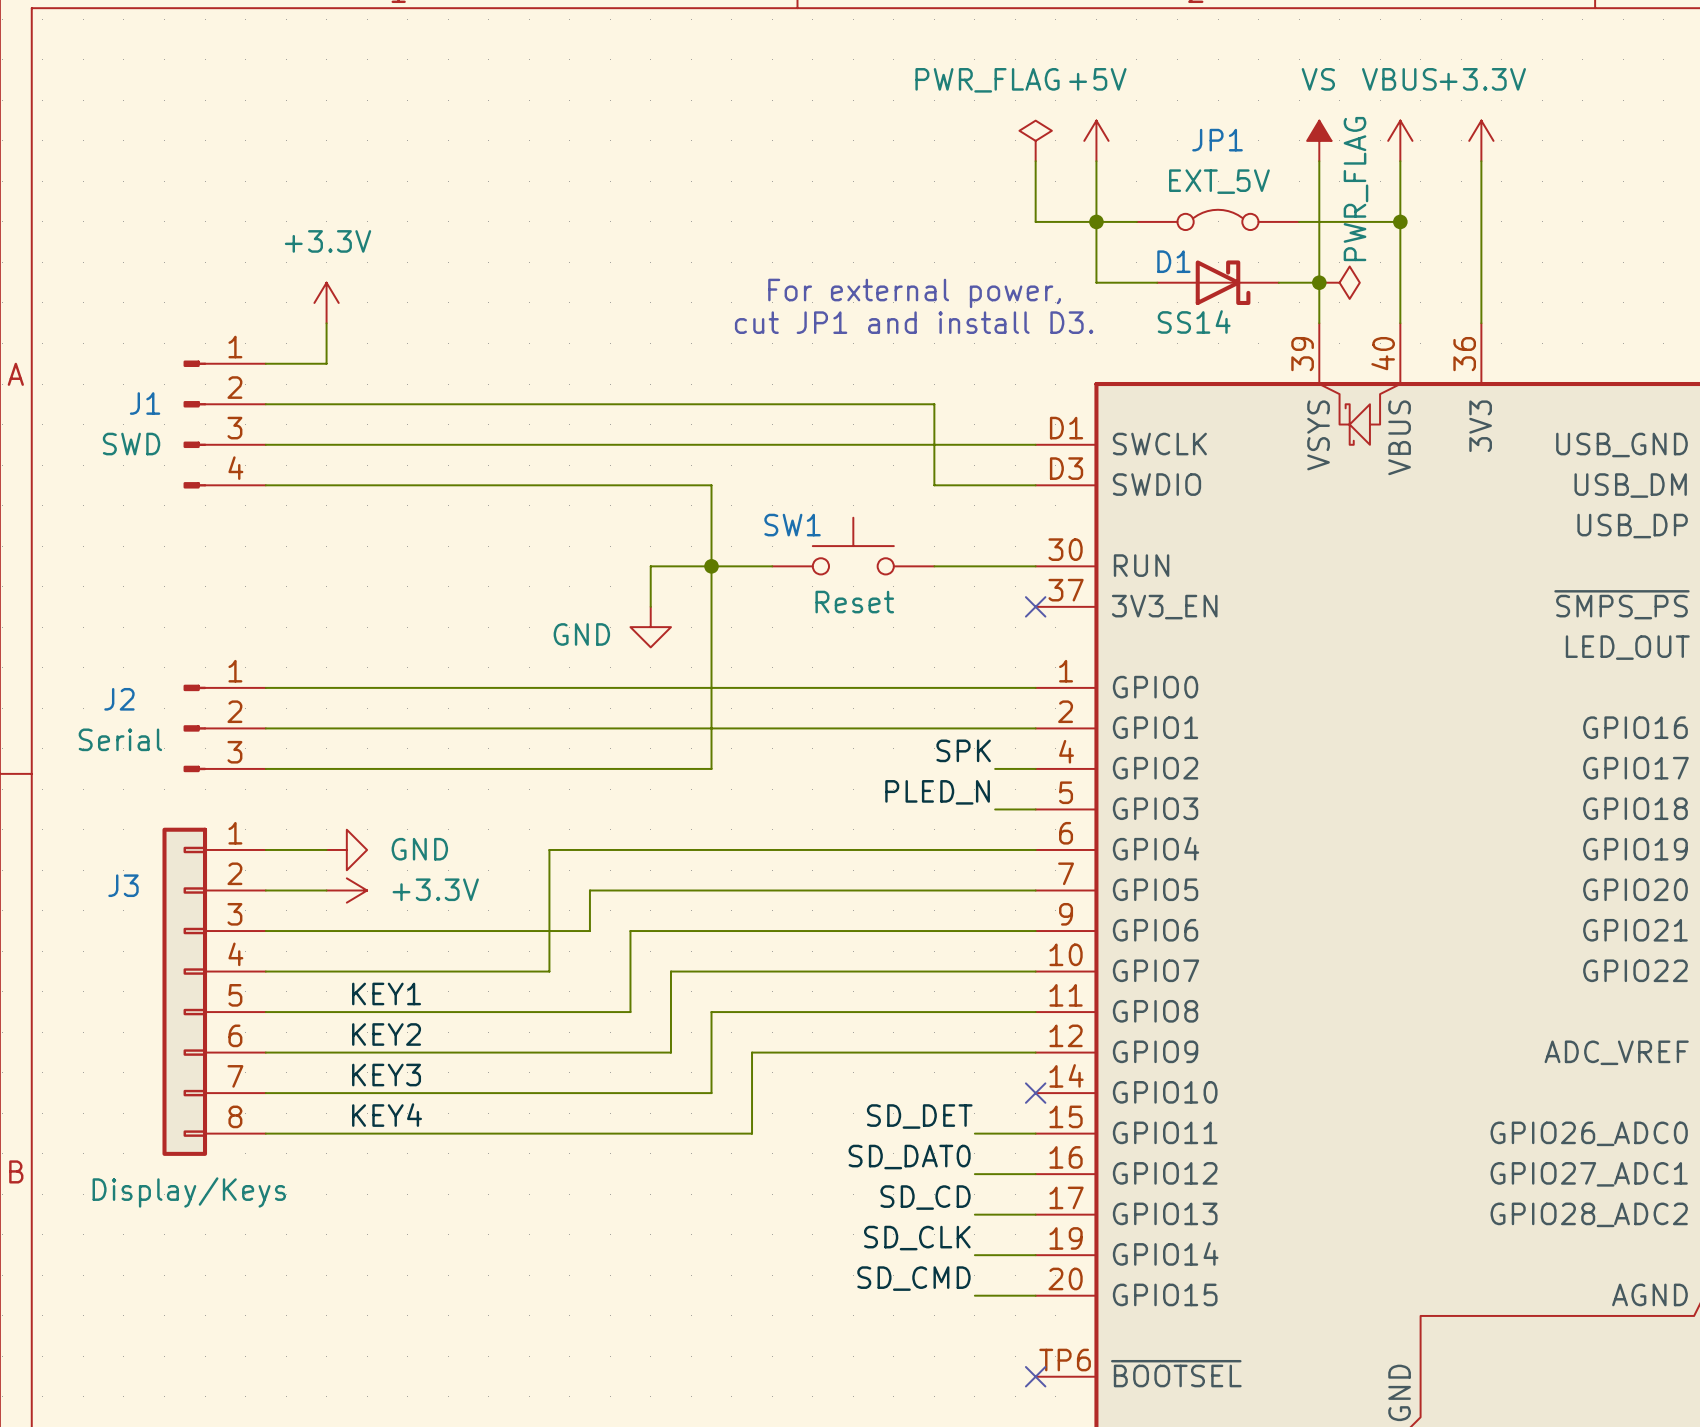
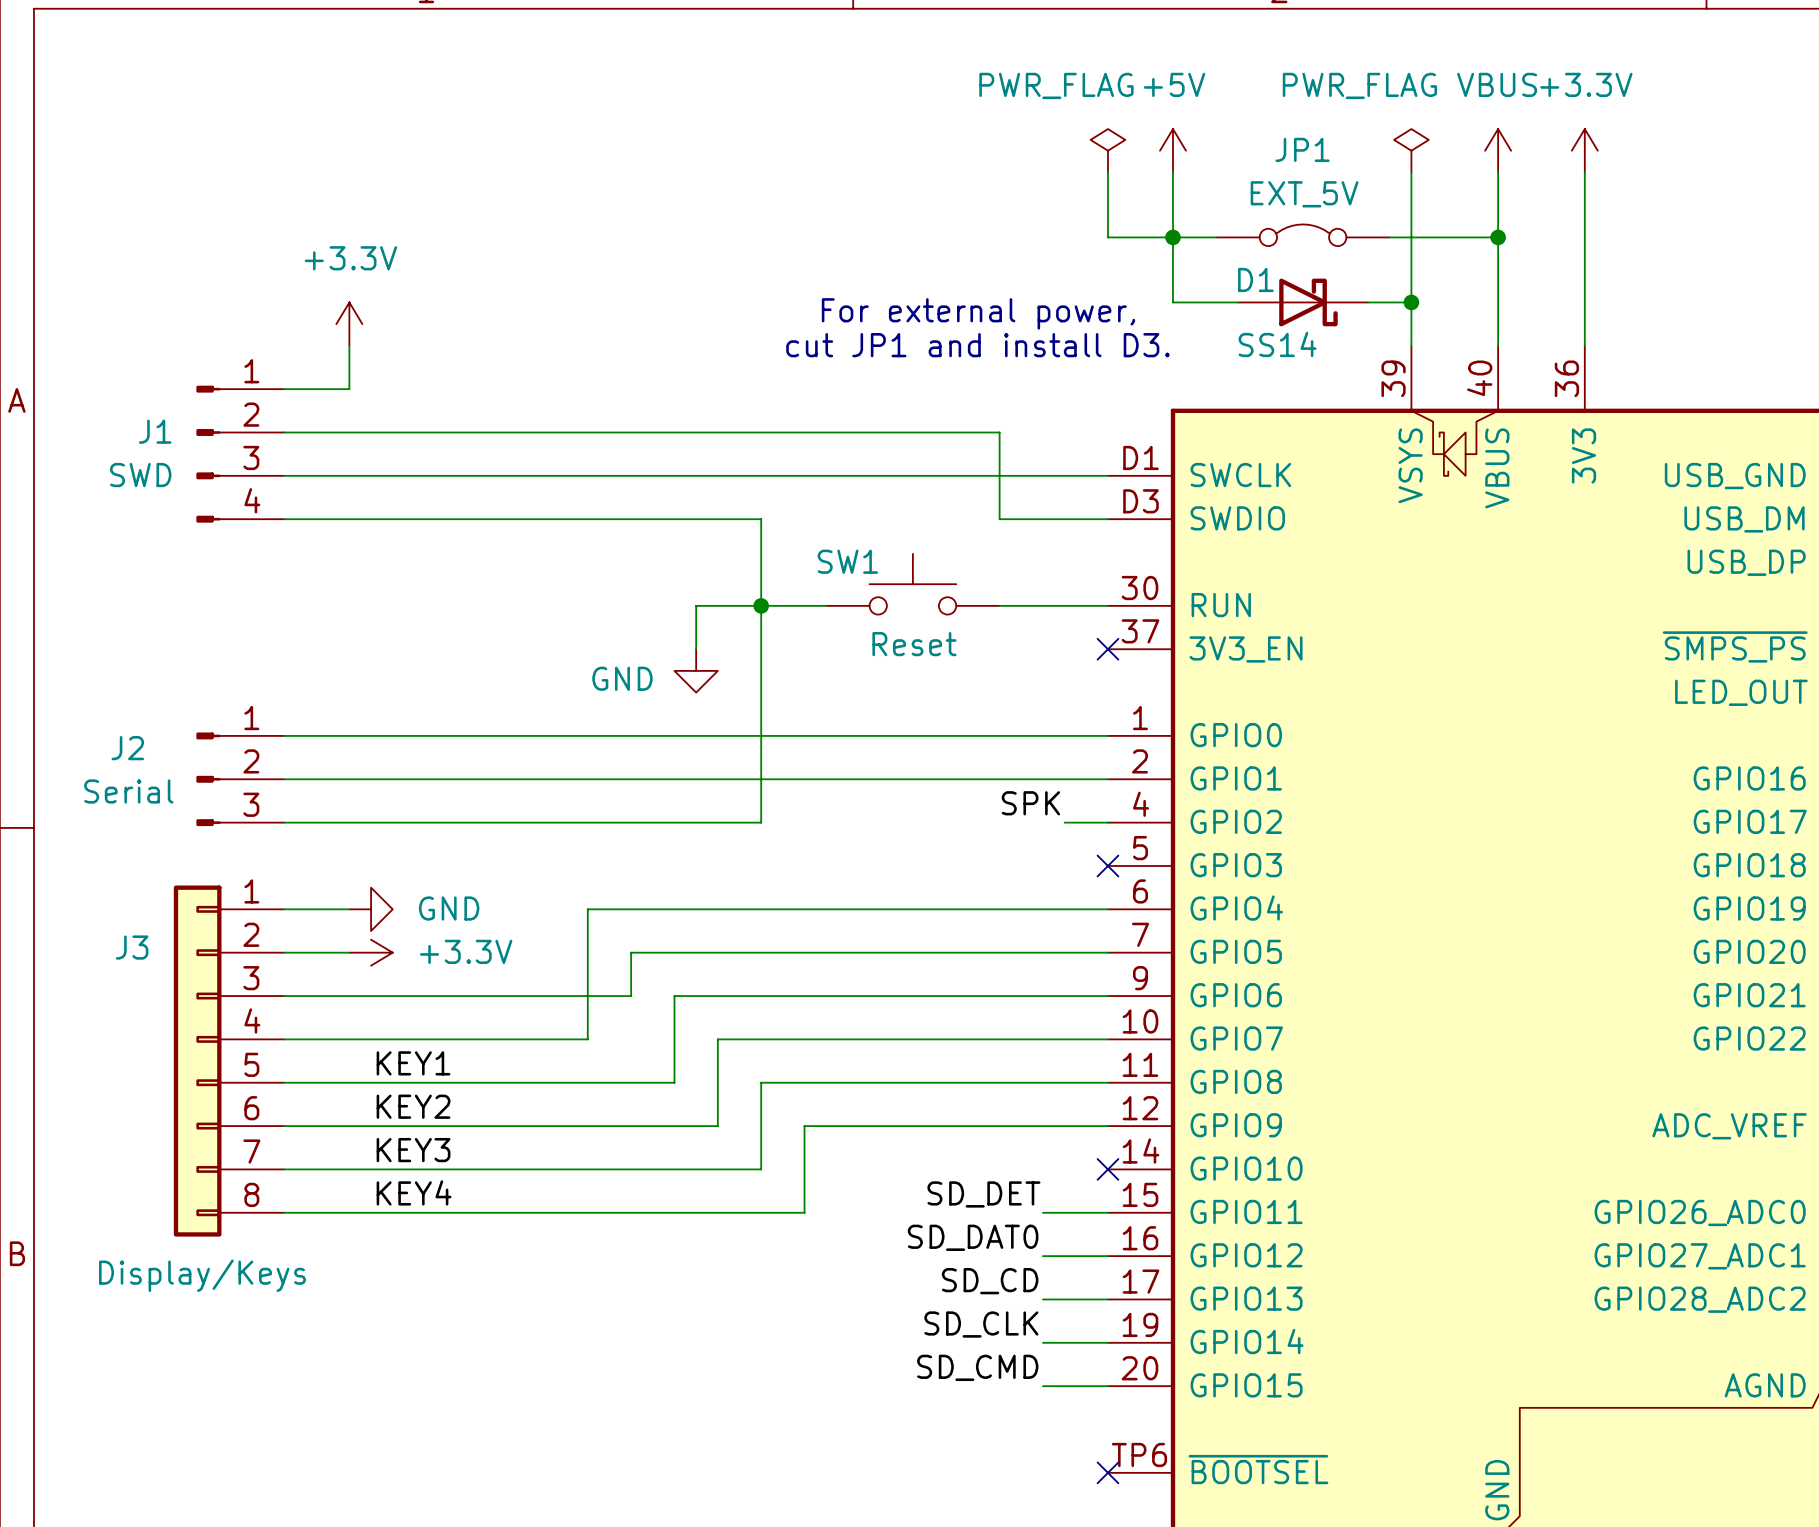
power symbol: VS (1319, 140) -> PWR_FLAG (1411, 150)
power symbol: PWR_FLAG (1339, 282) -> none
label: PLED_N (937, 792) -> none
wire: (995, 809) (1035, 809) -> none
no-connect mark: none -> (1107, 865)

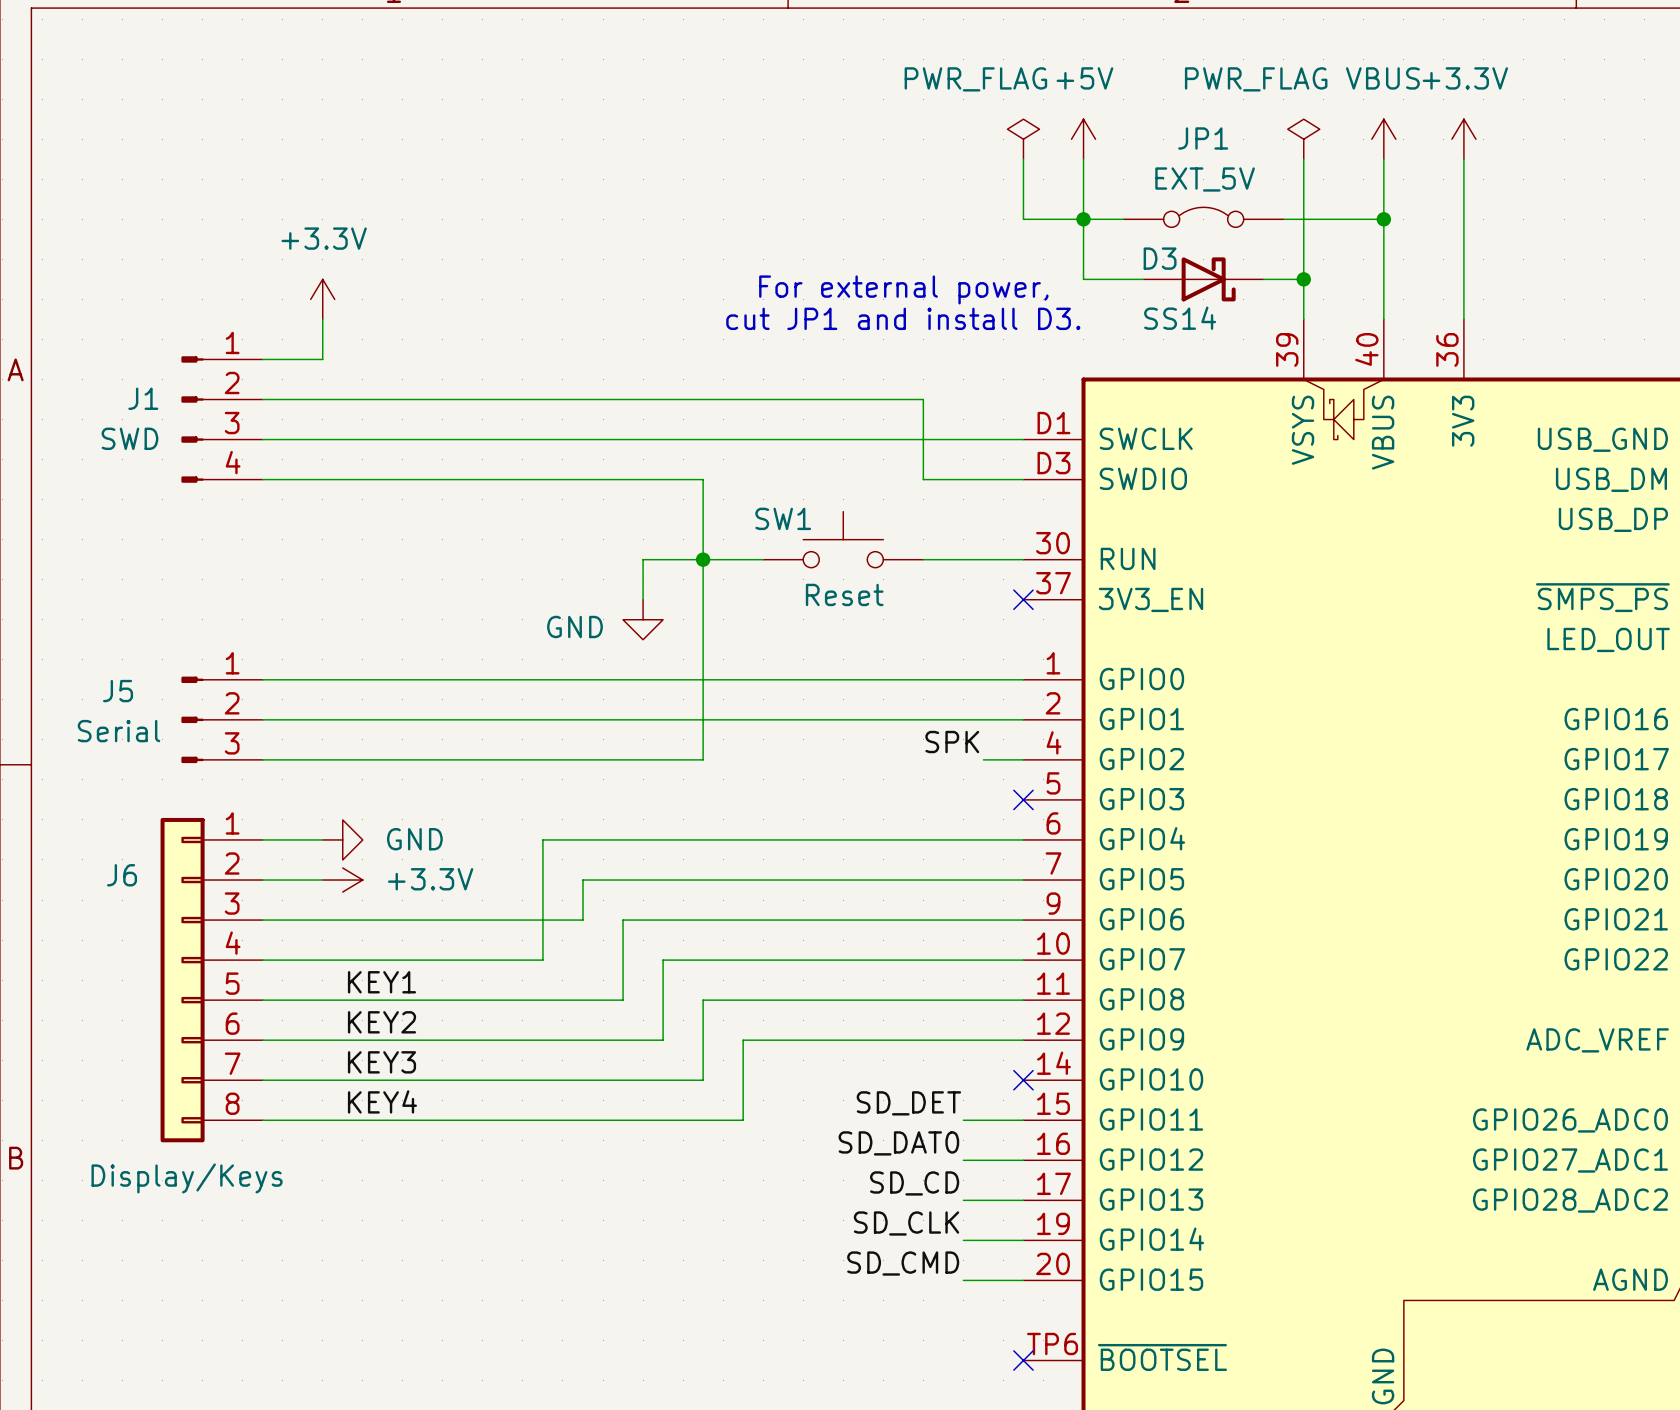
D1 name: D1 (1255, 279) -> D3 (1160, 258)
J2 name: J2 (127, 748) -> J5 (118, 691)
J3 name: J3 (132, 947) -> J6 (122, 875)

